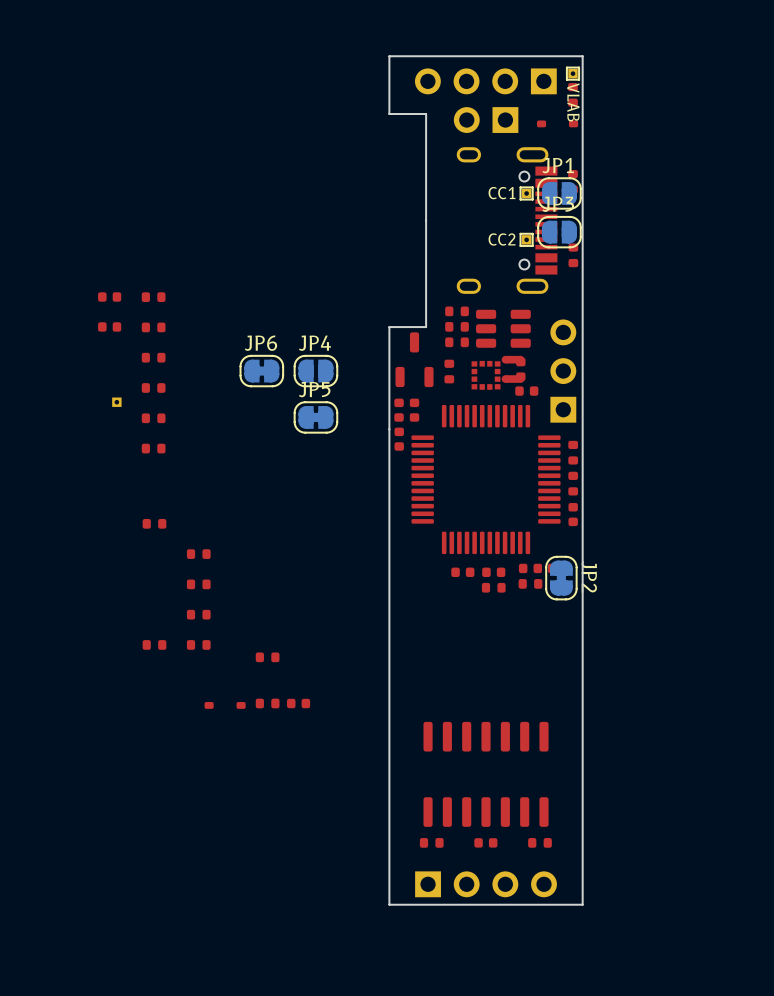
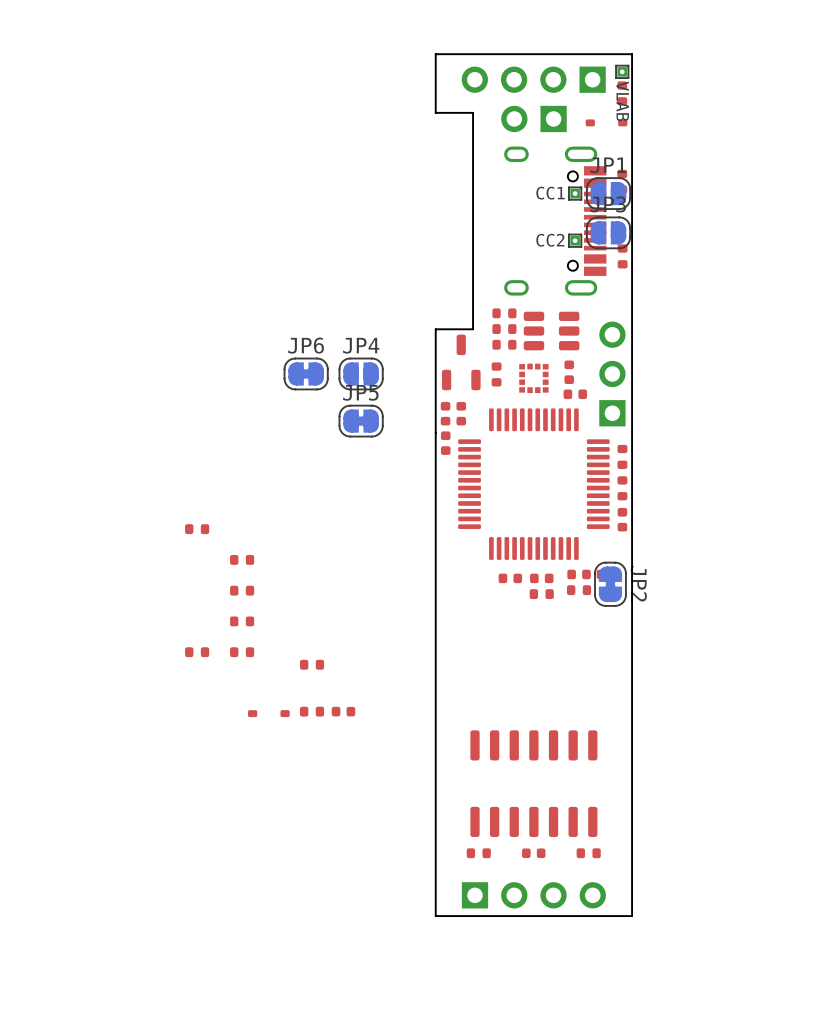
part: (109, 296) -> none
part: (153, 297) -> none
part: (109, 326) -> none
part: (153, 327) -> none
part: (153, 357) -> none
part: (513, 359) -> none
part: (513, 379) -> none
part: (153, 387) -> none
part: (116, 402) -> none
part: (153, 418) -> none
part: (153, 448) -> none

